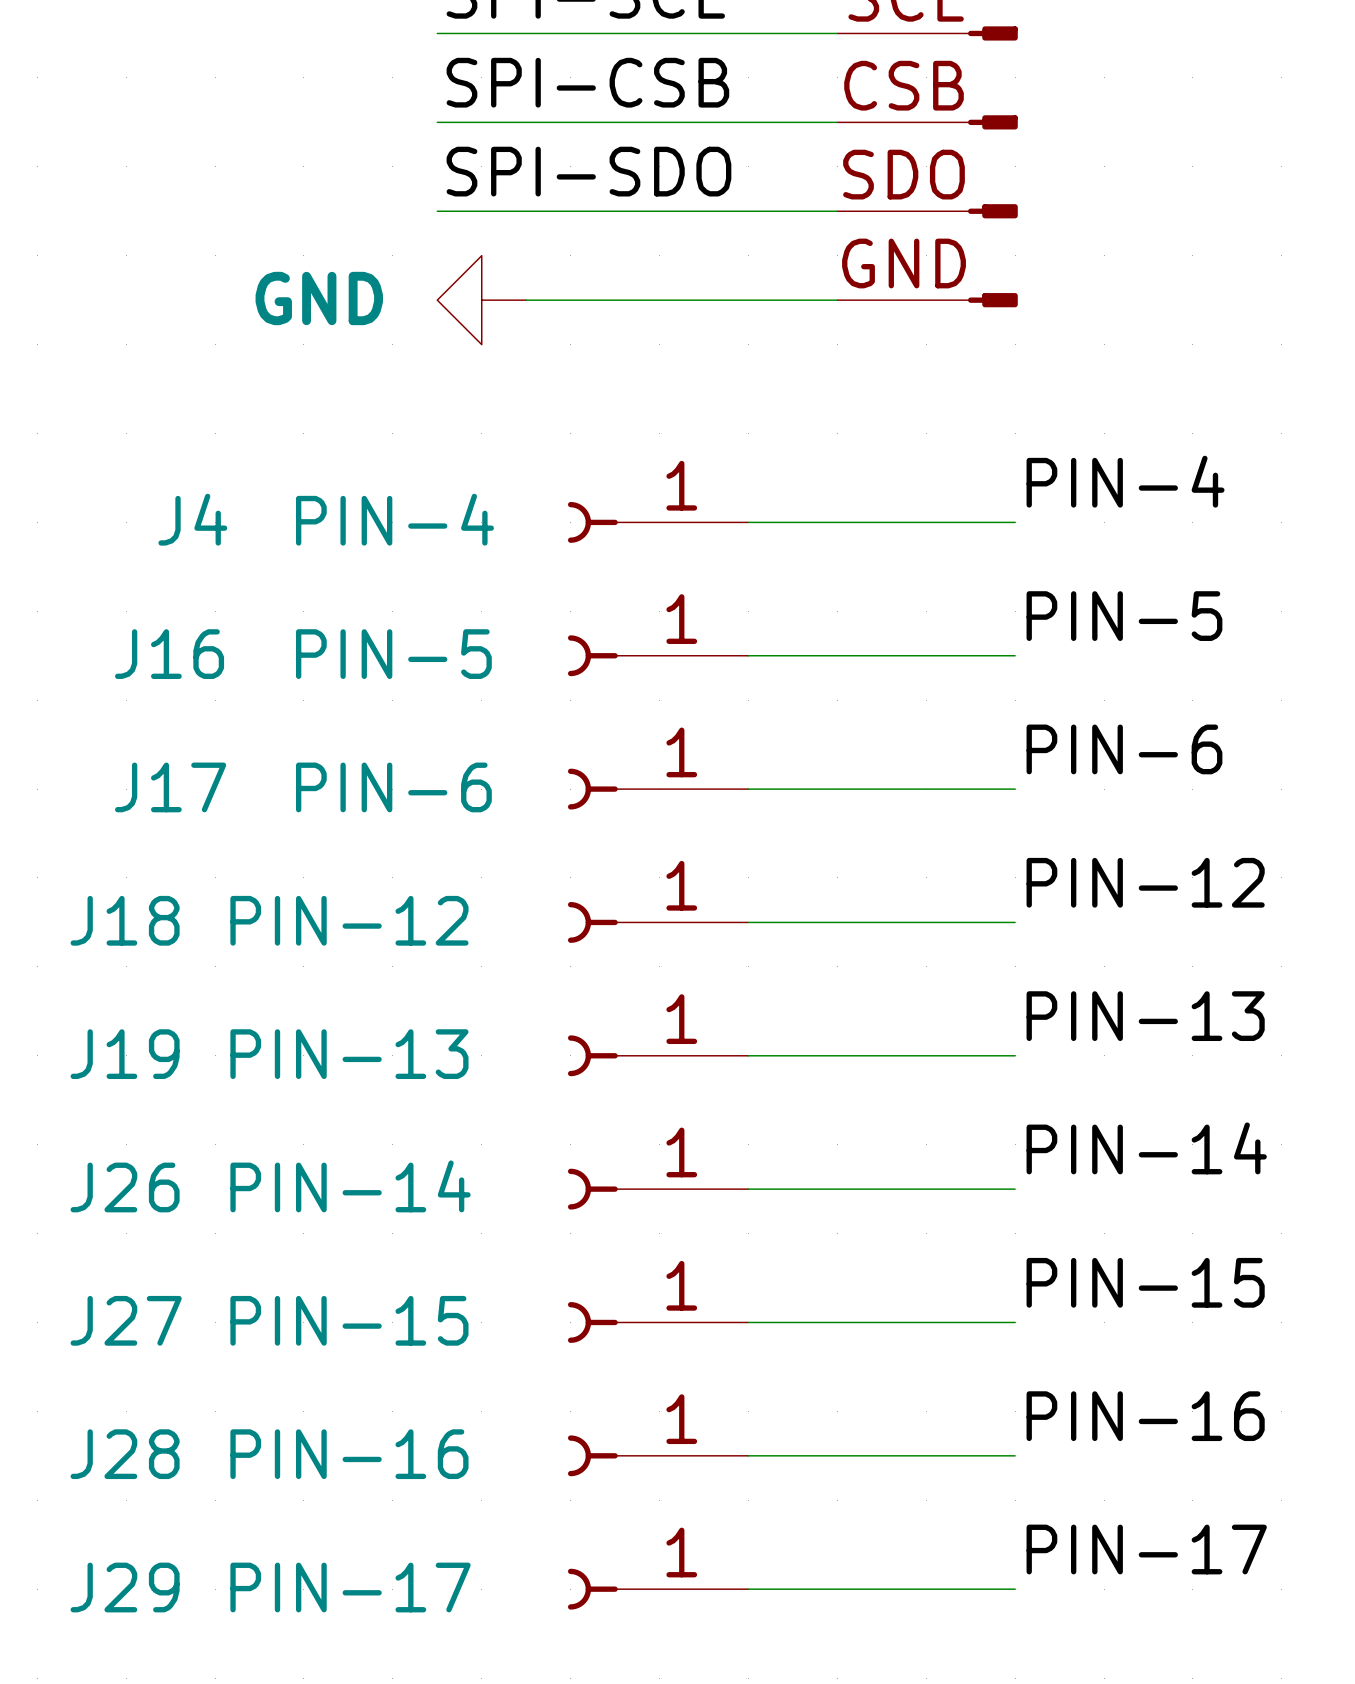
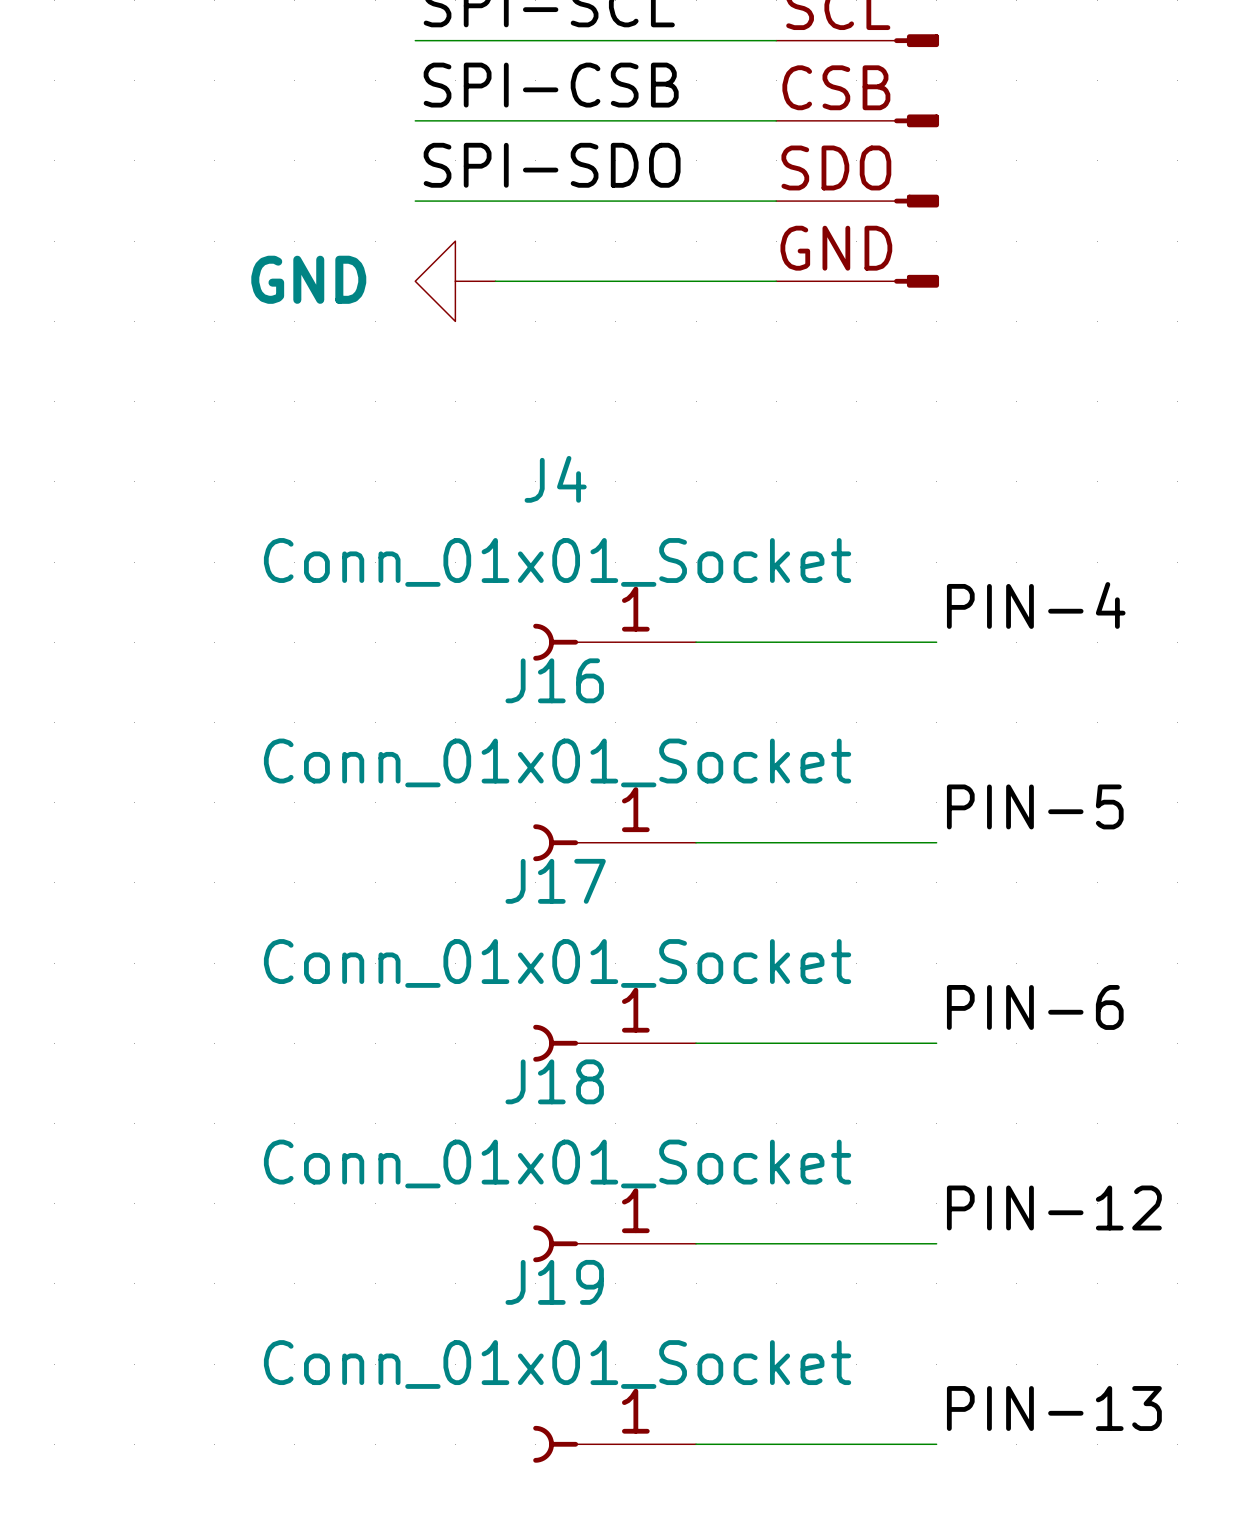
label position: PIN-4 (1125, 481) -> PIN-4 (1036, 605)
J4 name position: J4 (192, 519) -> J4 (555, 479)
J4 value: PIN-4 (394, 519) -> Conn_01x01_Socket (557, 562)
J4 position: (658, 522) -> (614, 642)
wire: (748, 522) (1015, 522) -> none
label: PIN-5 (1124, 616) -> none
J16: PIN-5 (658, 655) -> none
wire: (748, 655) (1015, 655) -> (696, 642) (936, 642)
label position: PIN-6 (1124, 749) -> PIN-6 (1035, 1007)
J17 name position: J17 (170, 787) -> J17 (555, 881)
J17 value: PIN-6 (393, 787) -> Conn_01x01_Socket (557, 963)
J17 position: (658, 789) -> (614, 1043)
wire: (748, 789) (1015, 789) -> none
label: PIN-12 (1145, 882) -> PIN-5 (1035, 806)
J18 name: J18 (125, 920) -> J16 (554, 680)
J18 value: PIN-12 (349, 920) -> Conn_01x01_Socket (557, 762)
label: PIN-13 (1145, 1016) -> none
J19: PIN-13 (658, 1055) -> none
wire: (748, 1055) (1015, 1055) -> none
label: PIN-14 (1146, 1148) -> none
J26: PIN-14 (658, 1189) -> none
wire: (748, 1189) (1015, 1189) -> (696, 1043) (936, 1043)
label: PIN-15 (1145, 1282) -> none
J27: PIN-15 (658, 1322) -> none
wire: (748, 1322) (1015, 1322) -> (696, 1243) (936, 1243)
label: none -> PIN-12 (1054, 1207)
J18: none -> Conn_01x01_Socket (614, 1243)
label: PIN-16 (1145, 1416) -> none
J28: PIN-16 (658, 1455) -> none
wire: (748, 1455) (1015, 1455) -> none
label: PIN-17 (1146, 1549) -> PIN-13 (1054, 1408)
J29 name: J29 (125, 1587) -> J19 (554, 1282)
J29 value: PIN-17 (350, 1587) -> Conn_01x01_Socket (557, 1364)

